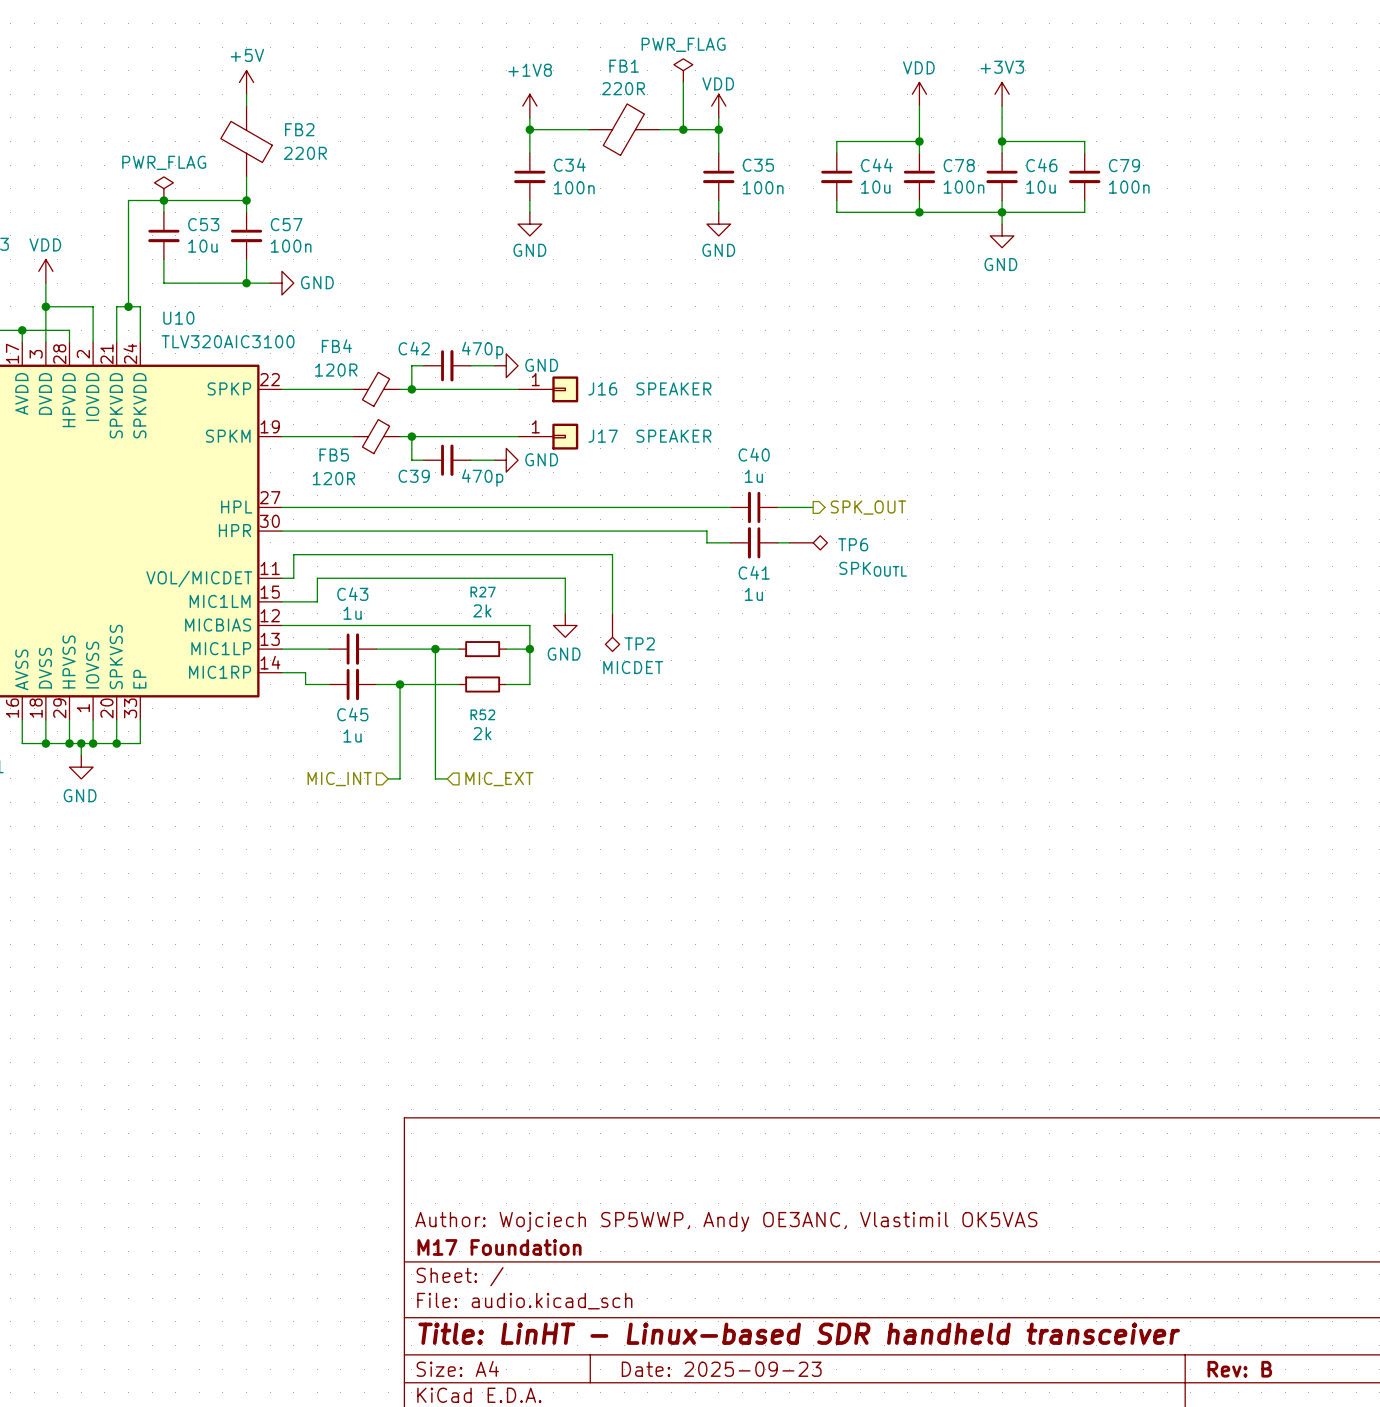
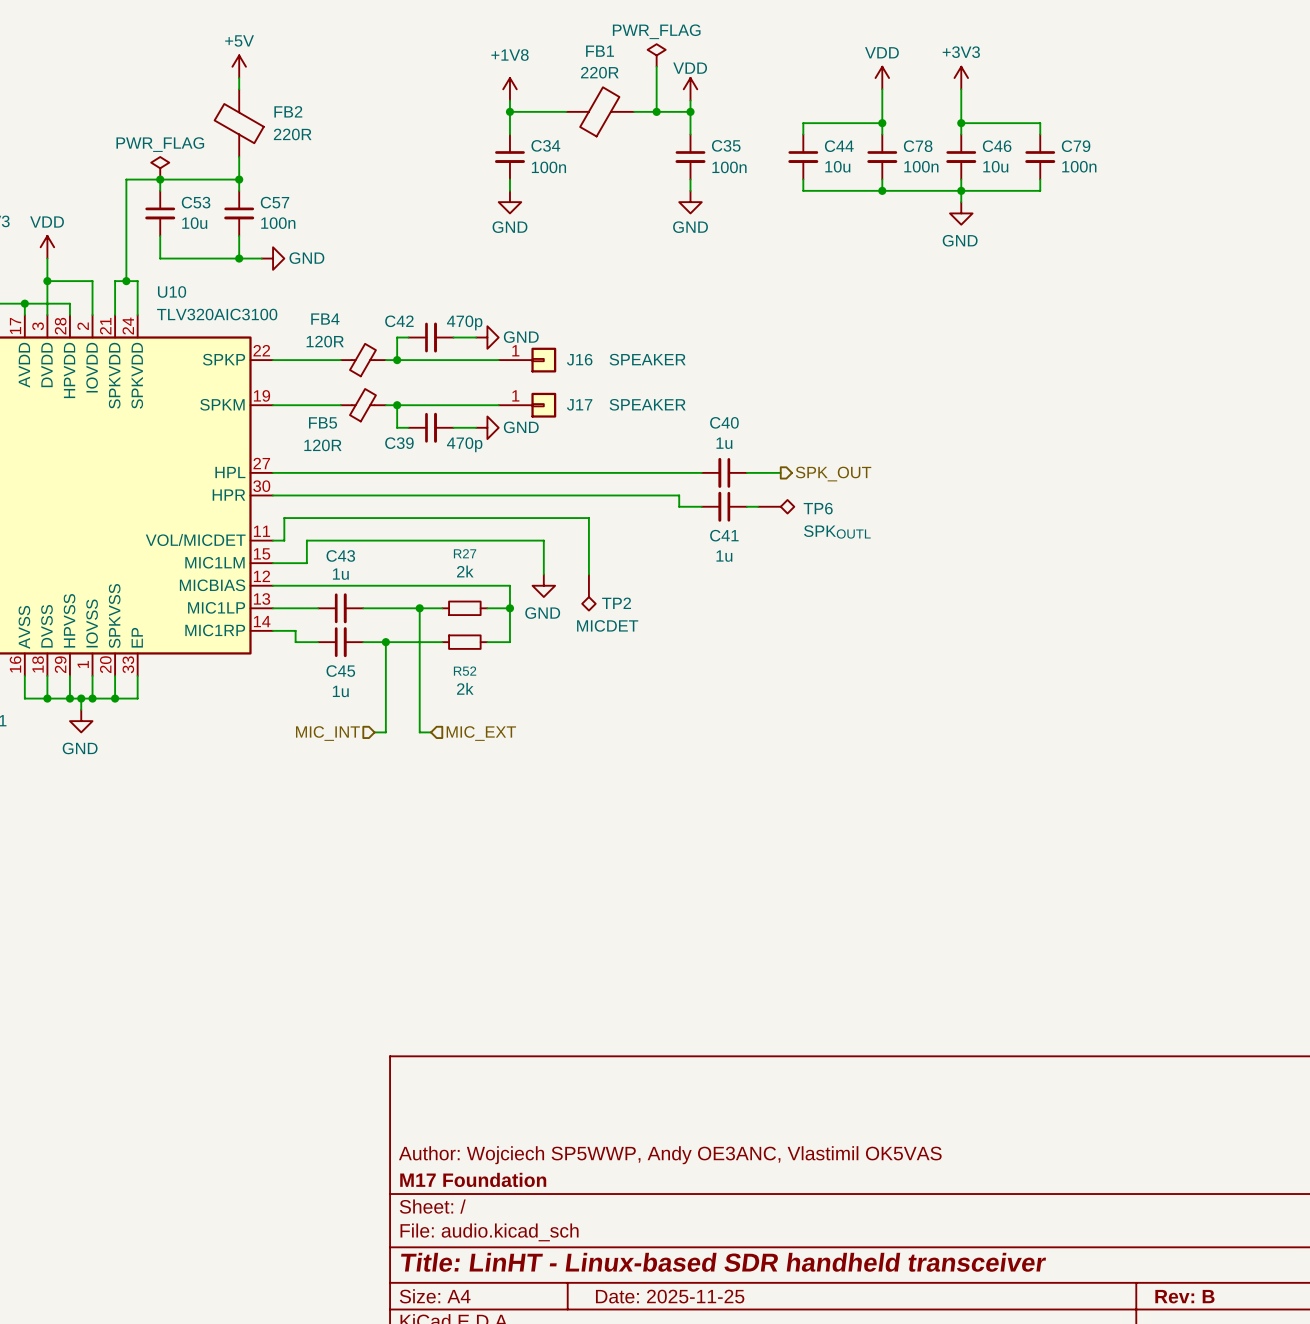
title block: Date: 2025-09-23 (721, 1369) -> Date: 2025-11-25 (670, 1296)

